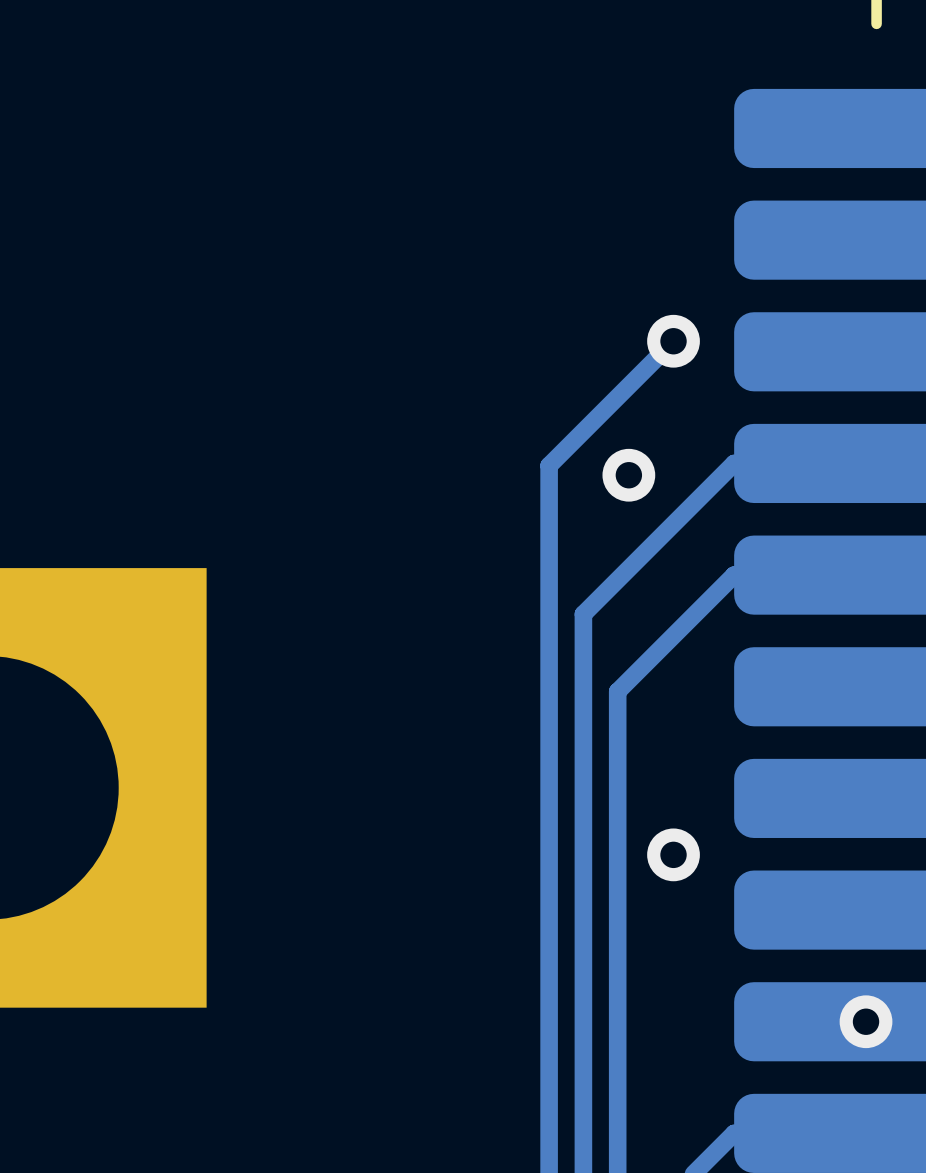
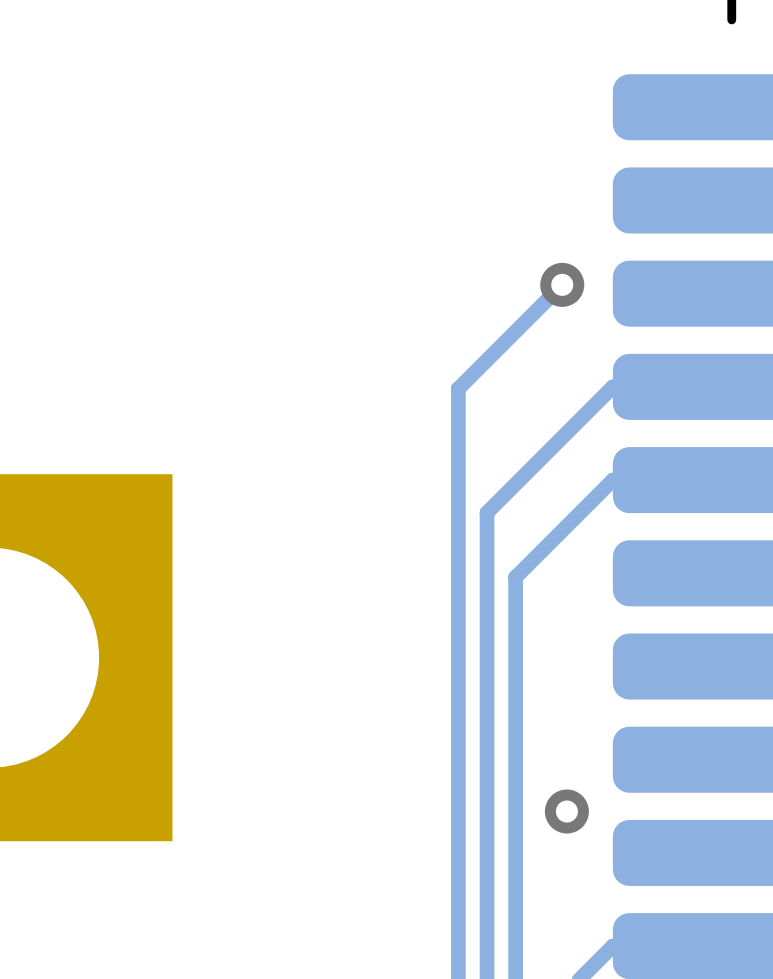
via: (628, 475) -> none
via: (673, 854) -> none
via: none -> (566, 811)
via: (866, 1021) -> none

